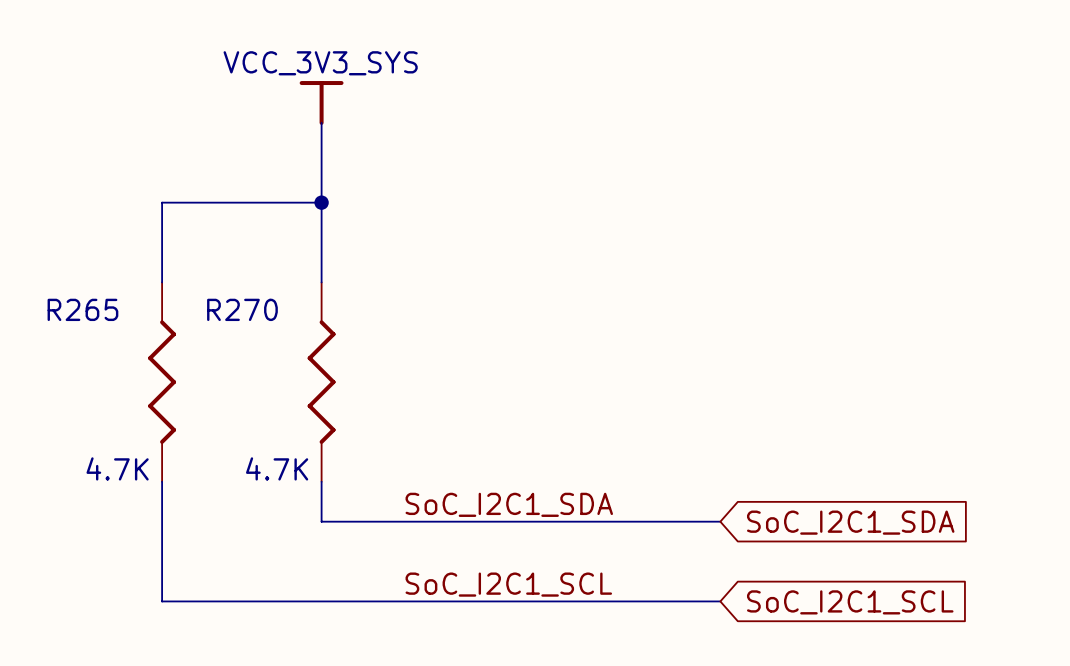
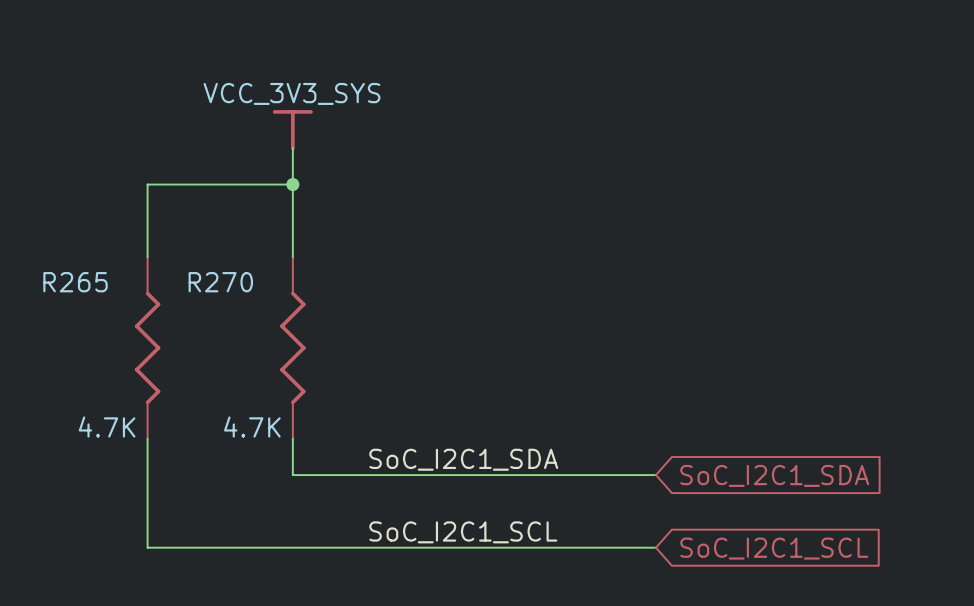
power symbol position: VCC_3V3_SYS (321, 102) -> VCC_3V3_SYS (292, 130)

